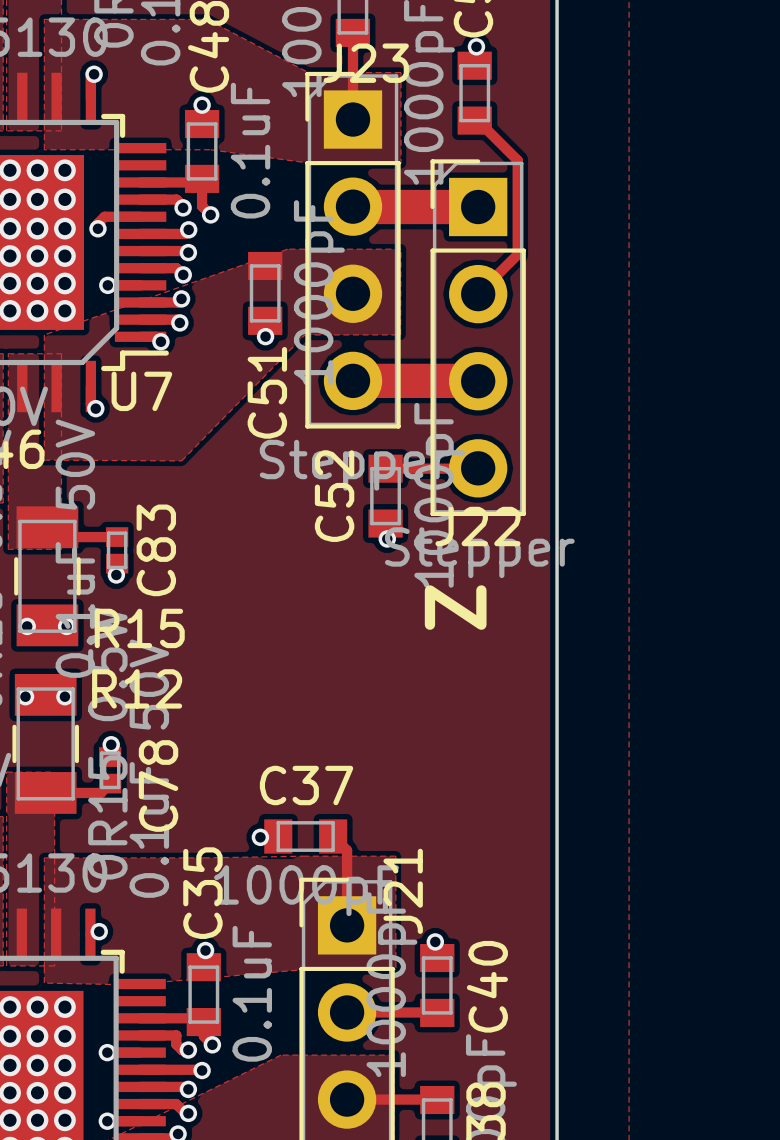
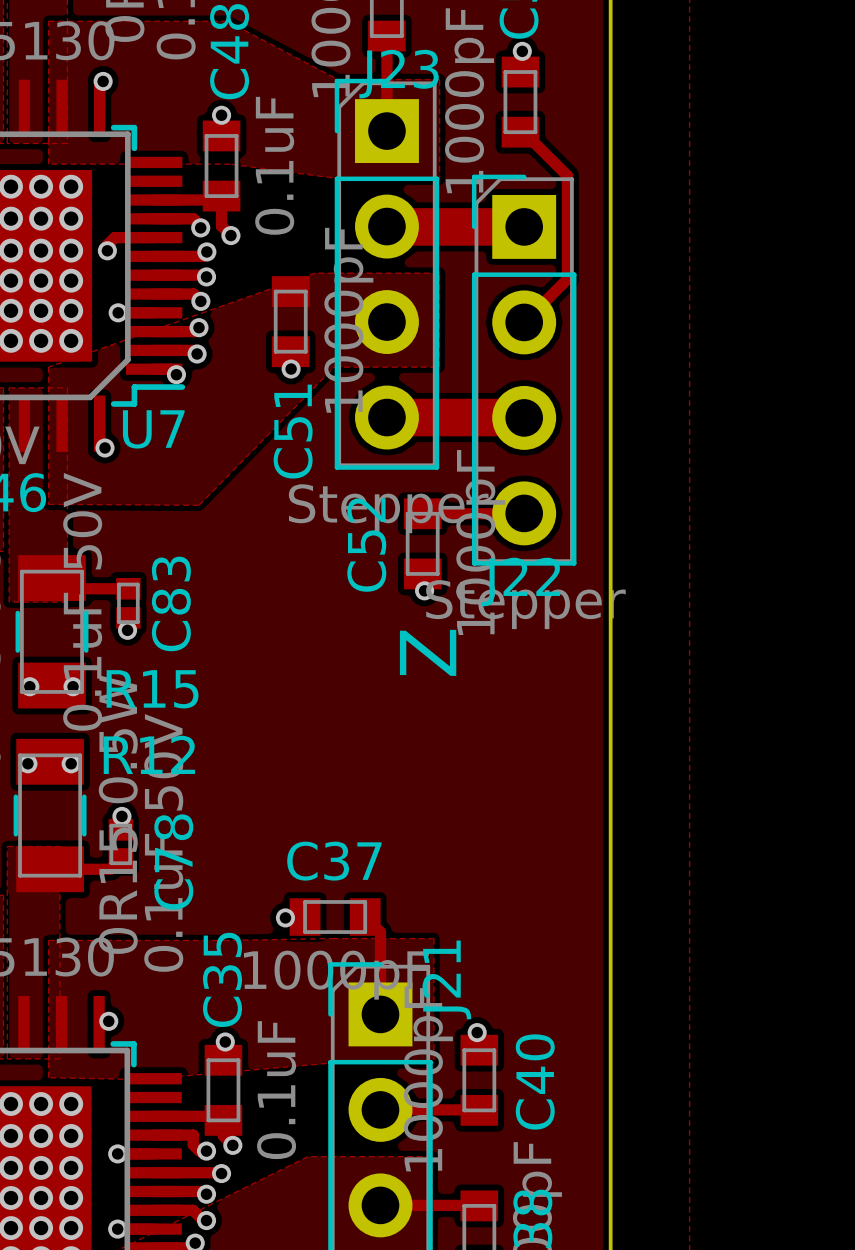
text position: Z (455, 607) -> Z (428, 652)

